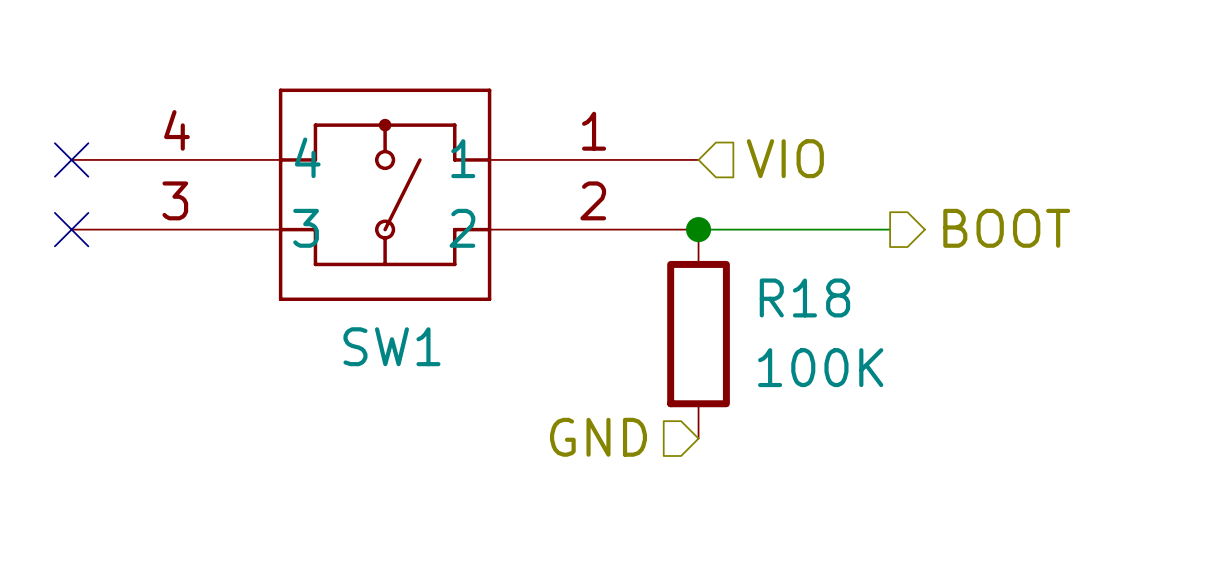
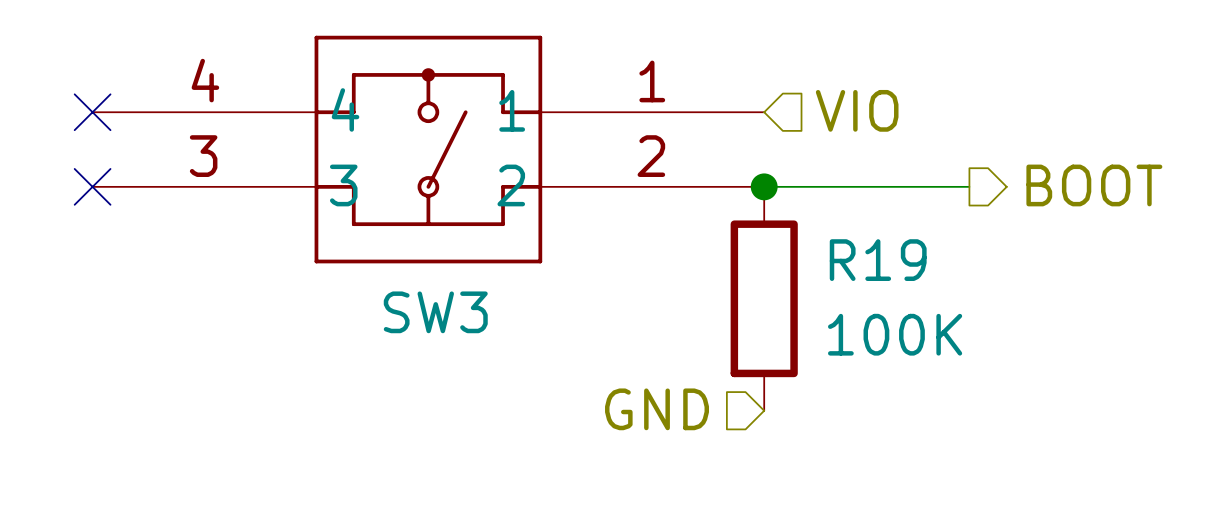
R18 name: R18 (804, 297) -> R19 (878, 260)
SW1 name: SW1 (391, 346) -> SW3 (435, 312)

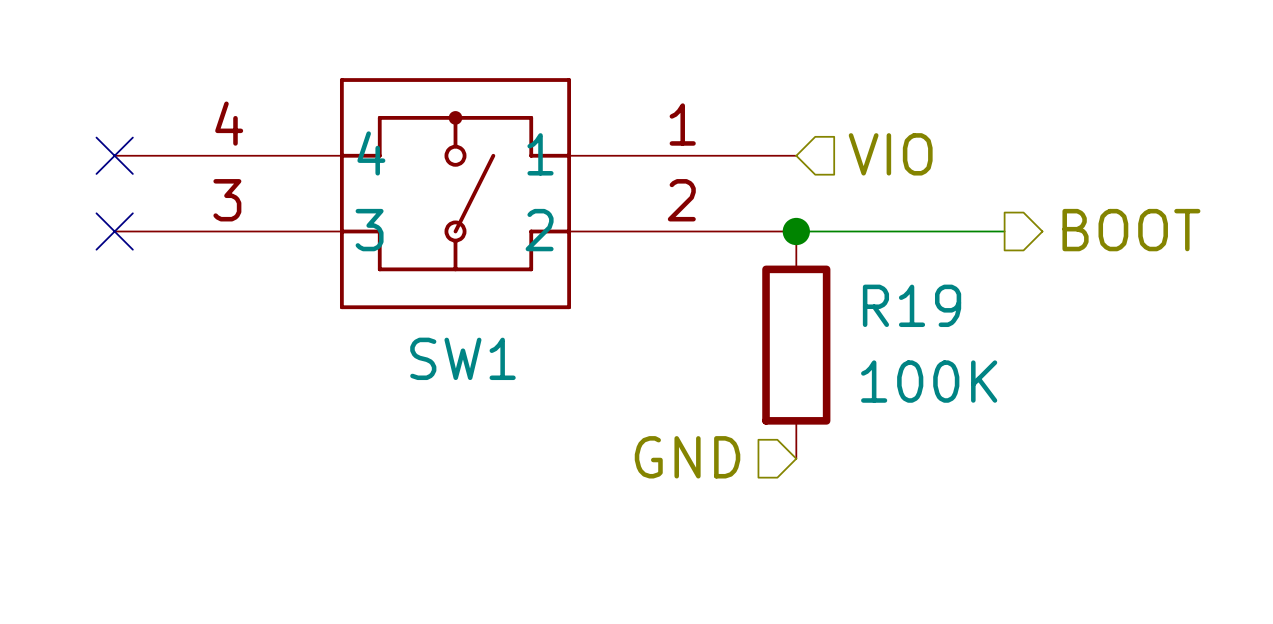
SW3 name: SW3 (435, 312) -> SW1 (462, 358)

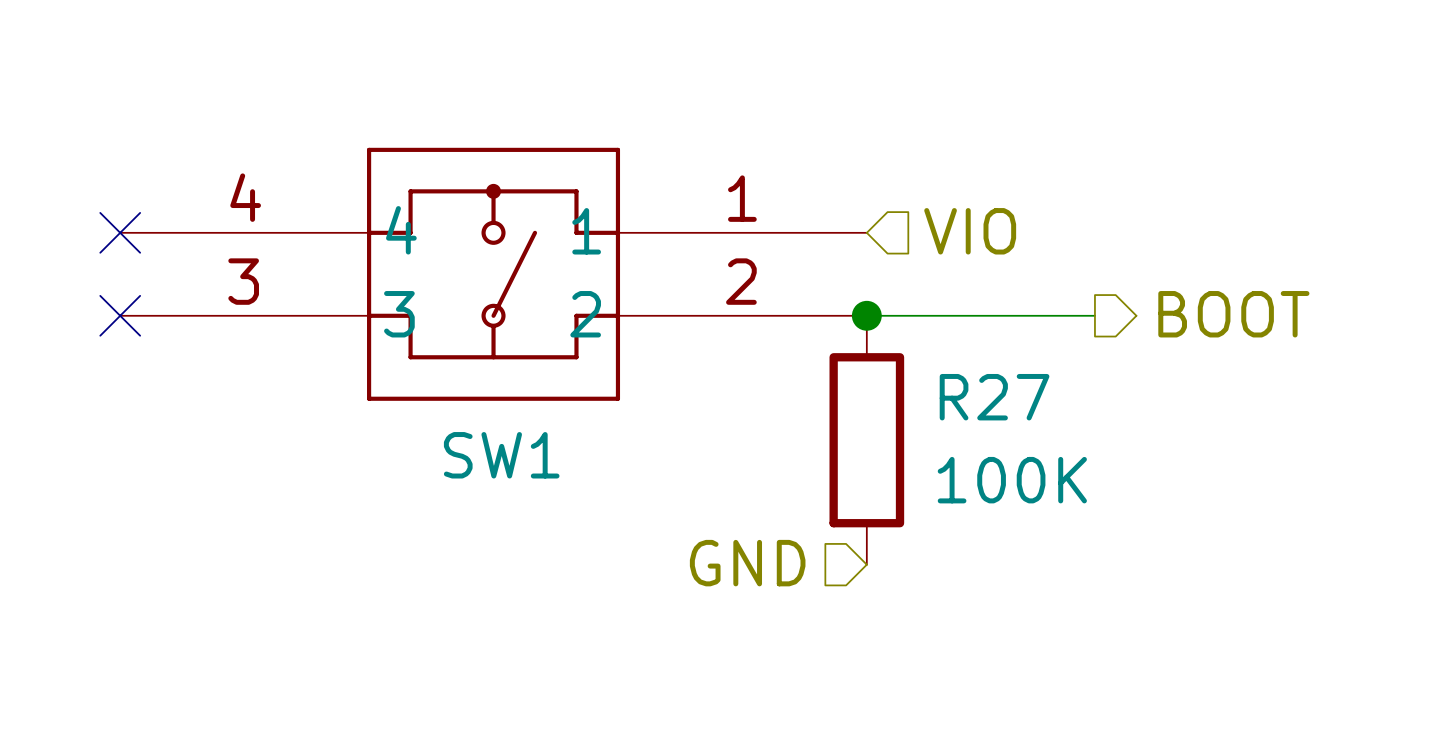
R19 name: R19 (912, 305) -> R27 (994, 397)

